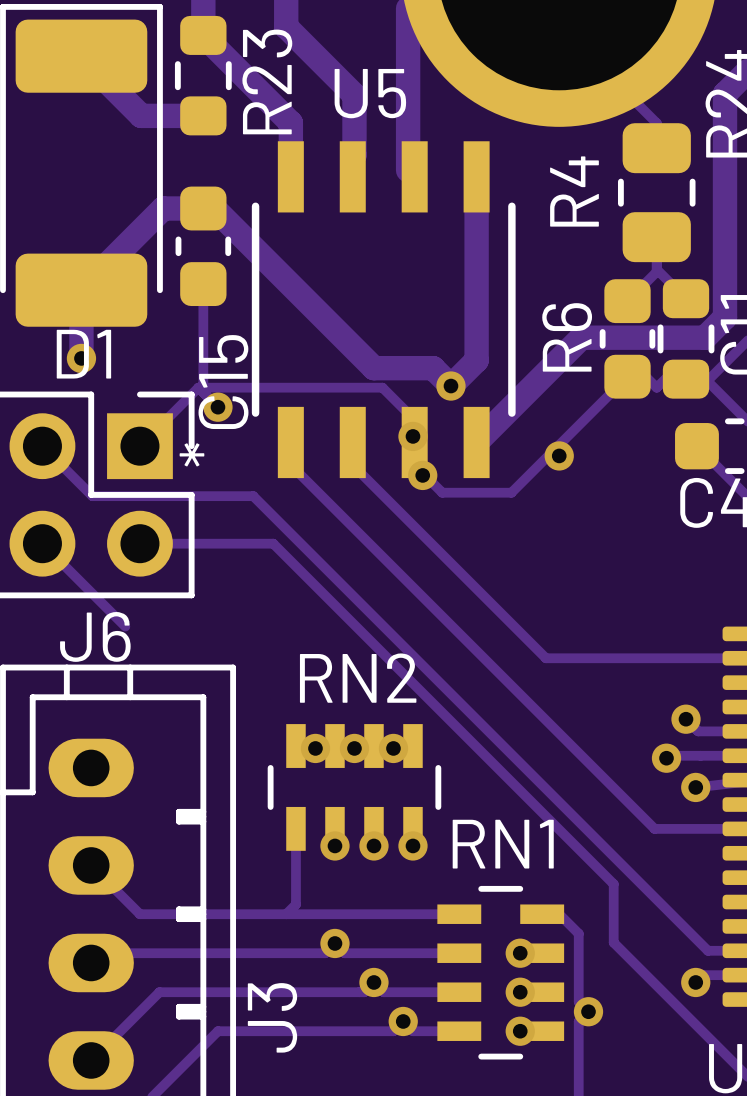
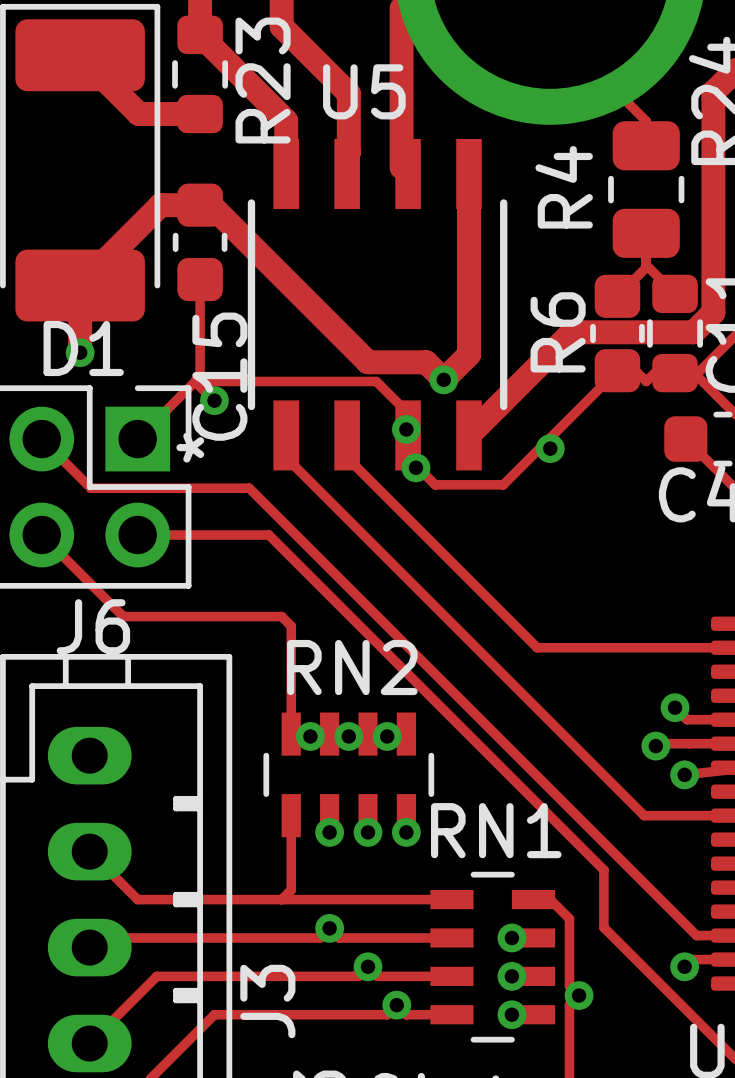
track: none -> (123, 616) (281, 616) (291, 626) (291, 734)

